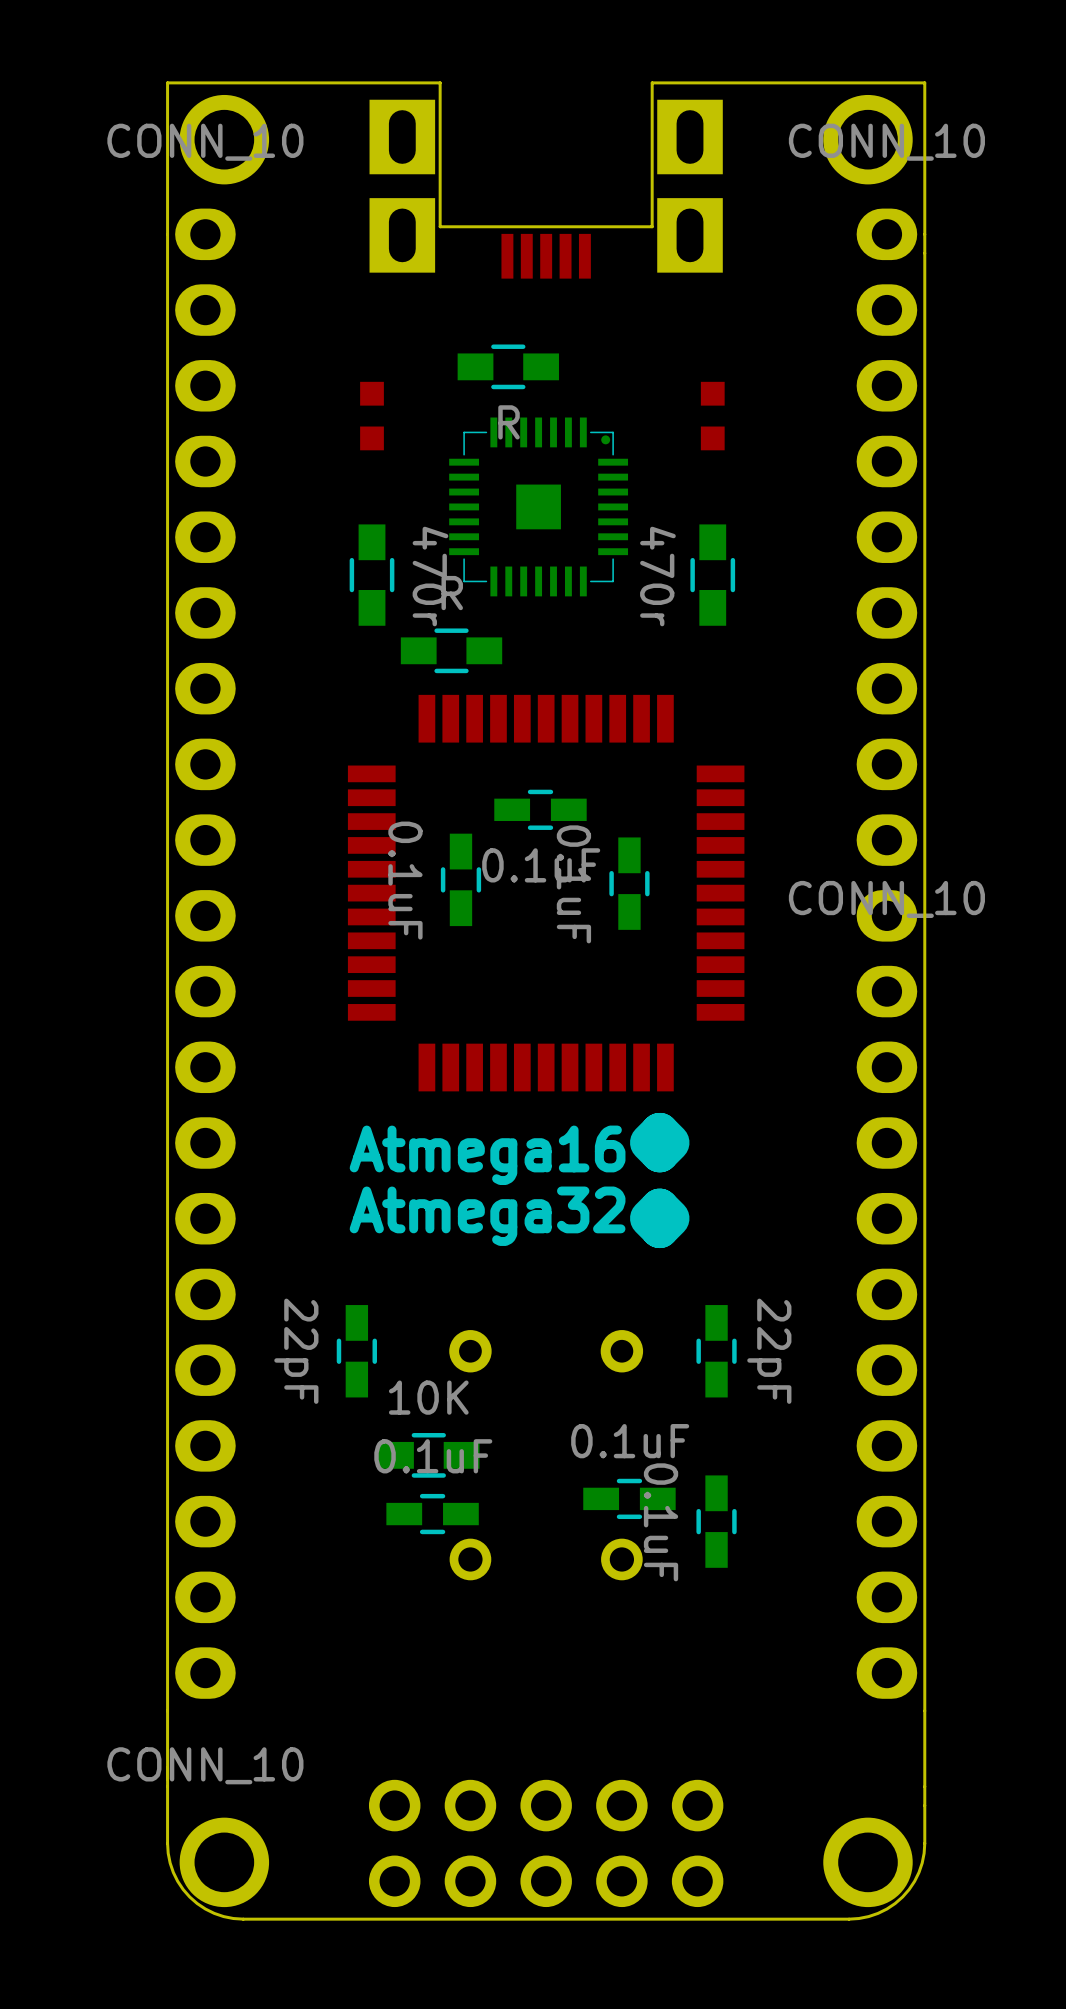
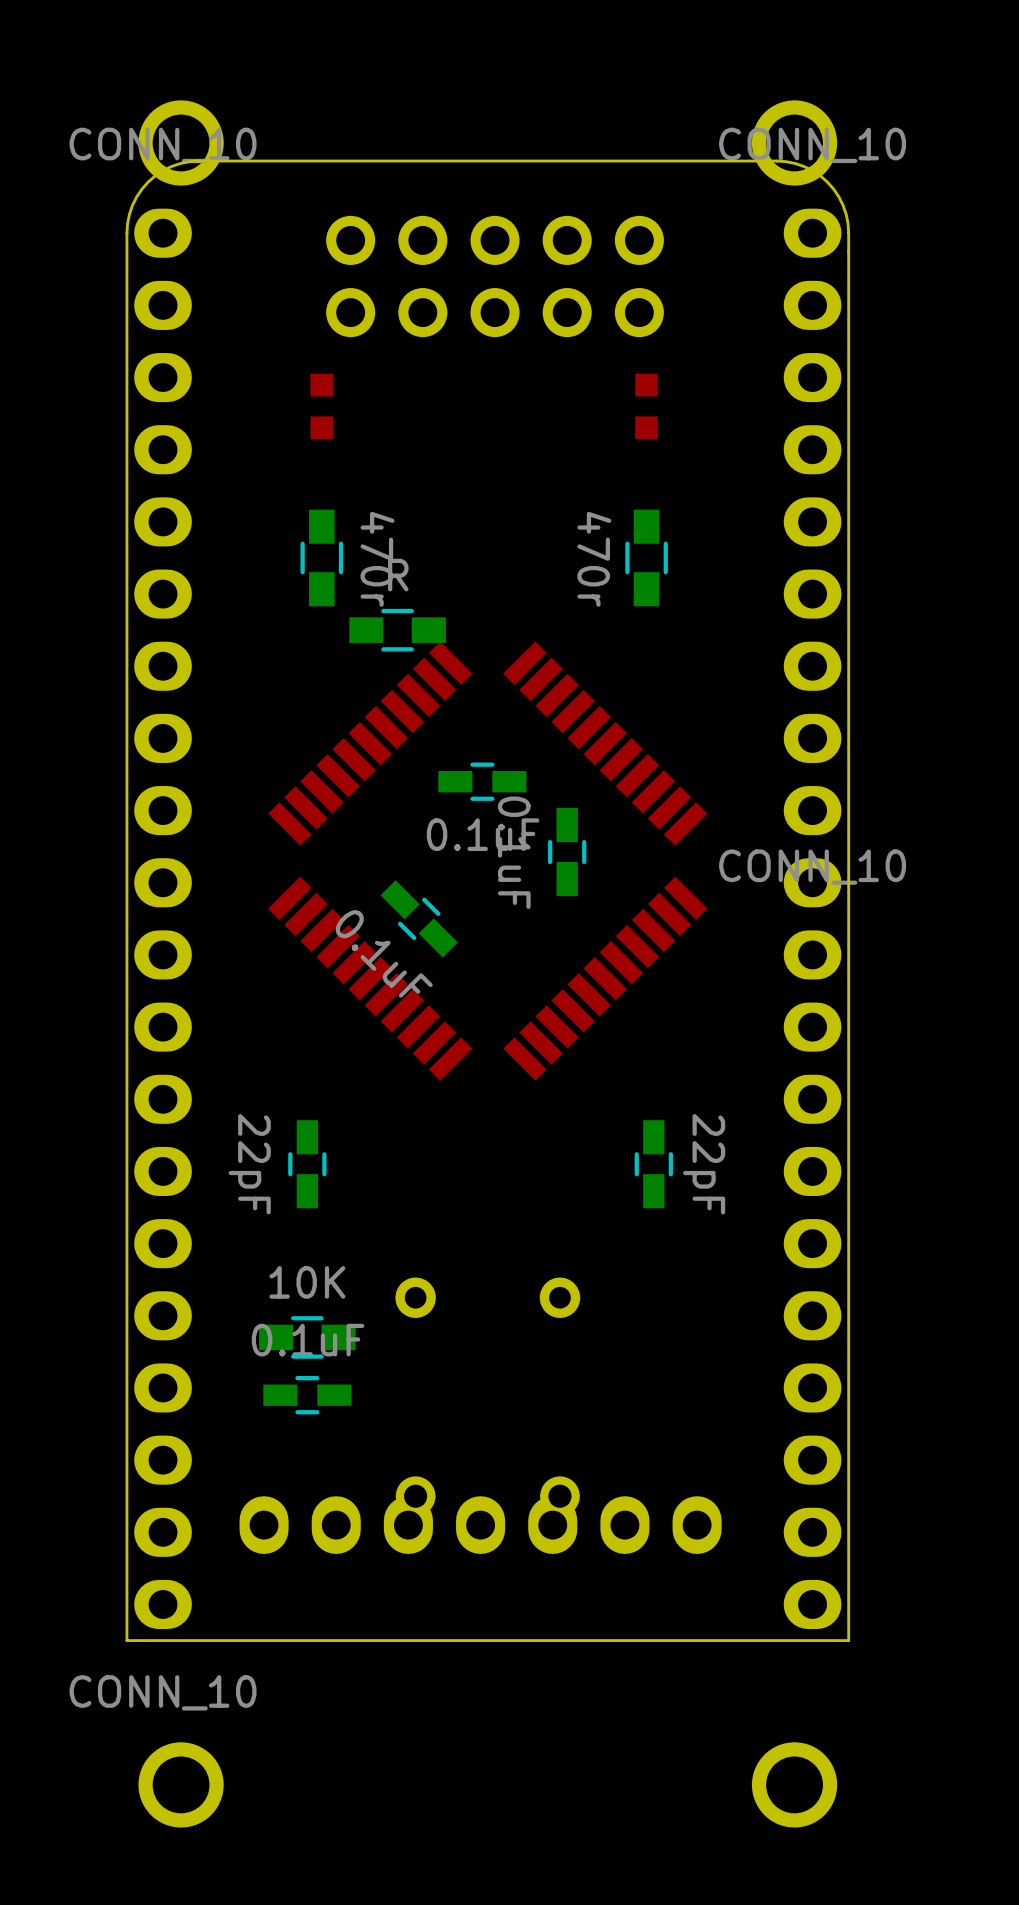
part: (546, 189) -> none
board edge: (924, 234) (924, 82) (652, 82) (652, 226) (440, 226) (440, 82) (167, 82) (167, 234) -> (848, 233) (843, 205) (827, 182) (804, 166) (776, 161) (189, 161) (163, 170) (141, 189) (129, 214) (126, 233)
part: none -> (495, 276)
part: R (508, 366) -> none
part: (538, 506) -> none
part: 0.1uF (460, 879) -> none
part rotation: 0° (546, 893) -> 45° clockwise (487, 861)
part: none -> 0.1uF (419, 918)
text: . (659, 1142) -> none
text: Atmega16 (487, 1155) -> none
text: Atmega32 (487, 1216) -> none
text: . (659, 1218) -> none
part position: (356, 1351) -> (307, 1164)
part position: (716, 1351) -> (653, 1164)
part position: (428, 1455) -> (307, 1337)
part: 0.1uF (629, 1498) -> none
part position: (432, 1514) -> (307, 1395)
part: 0.1uF (716, 1521) -> none
part: none -> (480, 1525)
board edge: (167, 1710) (167, 1843) (173, 1872) (183, 1889) (205, 1909) (223, 1916) (243, 1919) -> none
board edge: (924, 1710) (924, 1843) (922, 1863) (914, 1881) (902, 1896) (886, 1909) (868, 1916) (849, 1919) (243, 1919) -> (848, 1640) (126, 1640)
part: (546, 1843) -> none

